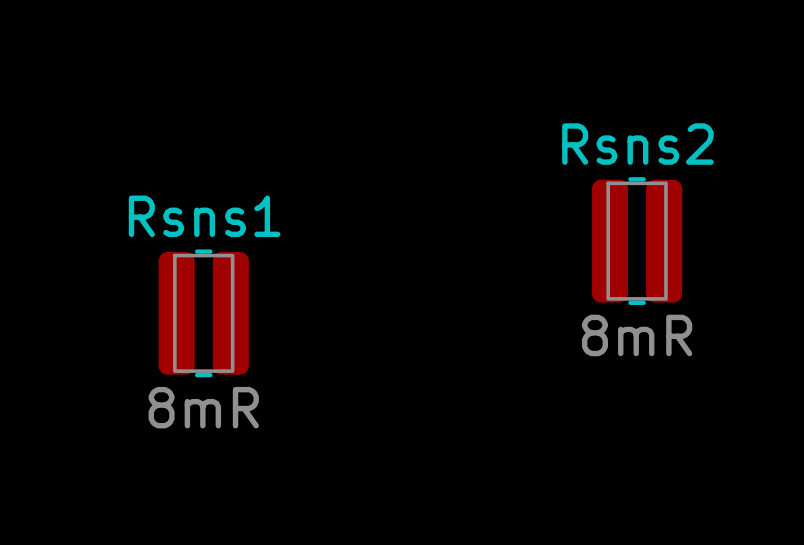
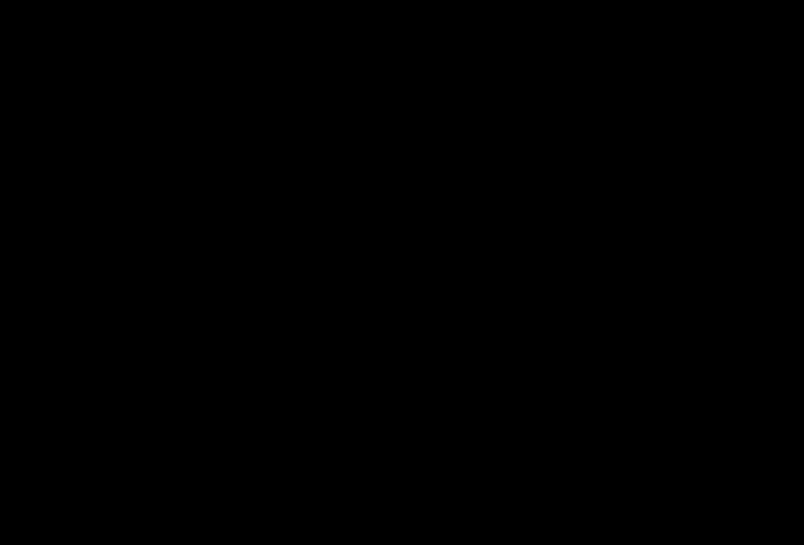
Rsns2: 8mR (637, 241) -> none
Rsns1: 8mR (203, 313) -> none

